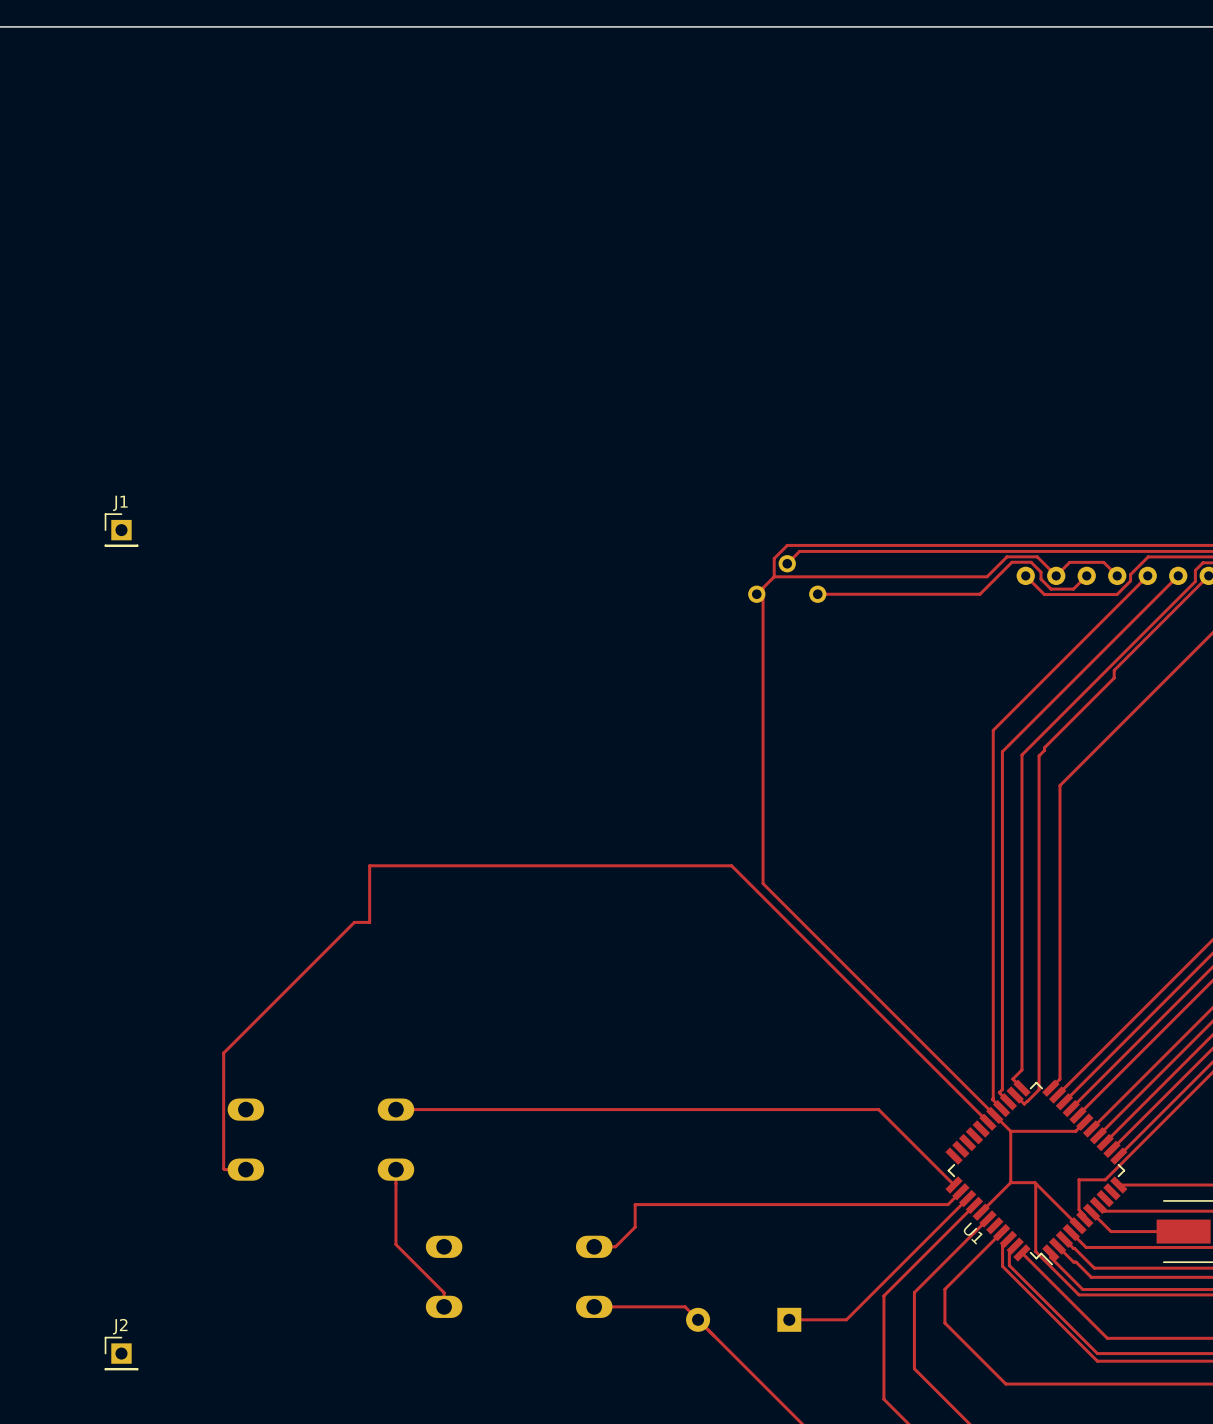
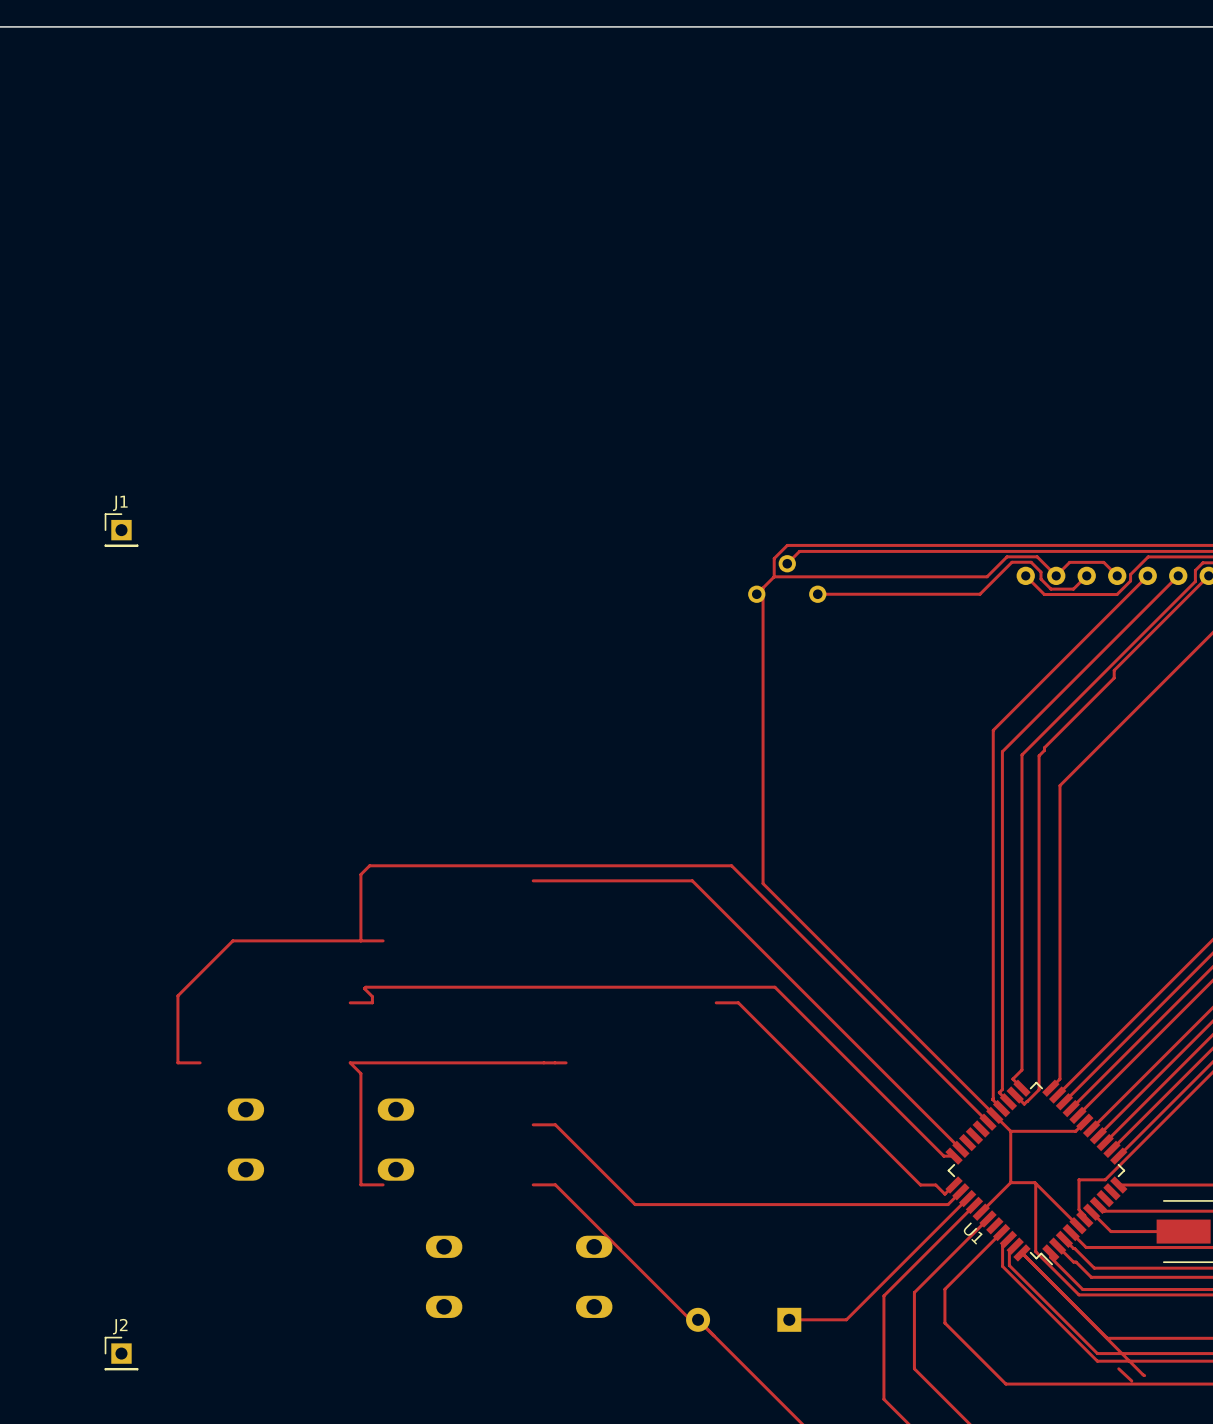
track: (369, 865) (369, 922) (354, 922) (223, 1053) (223, 1168) (245, 1169) -> (369, 865) (360, 874) (360, 940)
track: none -> (533, 880) (692, 880) (960, 1149)
track: none -> (383, 940) (232, 940) (177, 995) (177, 1062) (200, 1062)
track: none -> (350, 1002) (372, 1002) (372, 996) (364, 988) (365, 987) (774, 987) (943, 1156) (954, 1156)
track: none -> (566, 1062) (350, 1062) (360, 1073) (360, 1184) (383, 1184)
track: (395, 1109) (878, 1109) (954, 1185) -> (716, 1002) (738, 1002) (920, 1185) (935, 1185) (944, 1194) (954, 1185)
track: (395, 1169) (395, 1244) (444, 1292) (444, 1306) -> none
track: none -> (533, 1184) (555, 1184) (690, 1319)
track: (635, 1204) (635, 1227) (615, 1246) (594, 1246) -> (635, 1204) (555, 1124) (533, 1124)
track: none -> (1024, 1255) (1144, 1375)
track: (594, 1306) (685, 1306) (698, 1319) -> none
track: none -> (1118, 1368) (1131, 1381)

